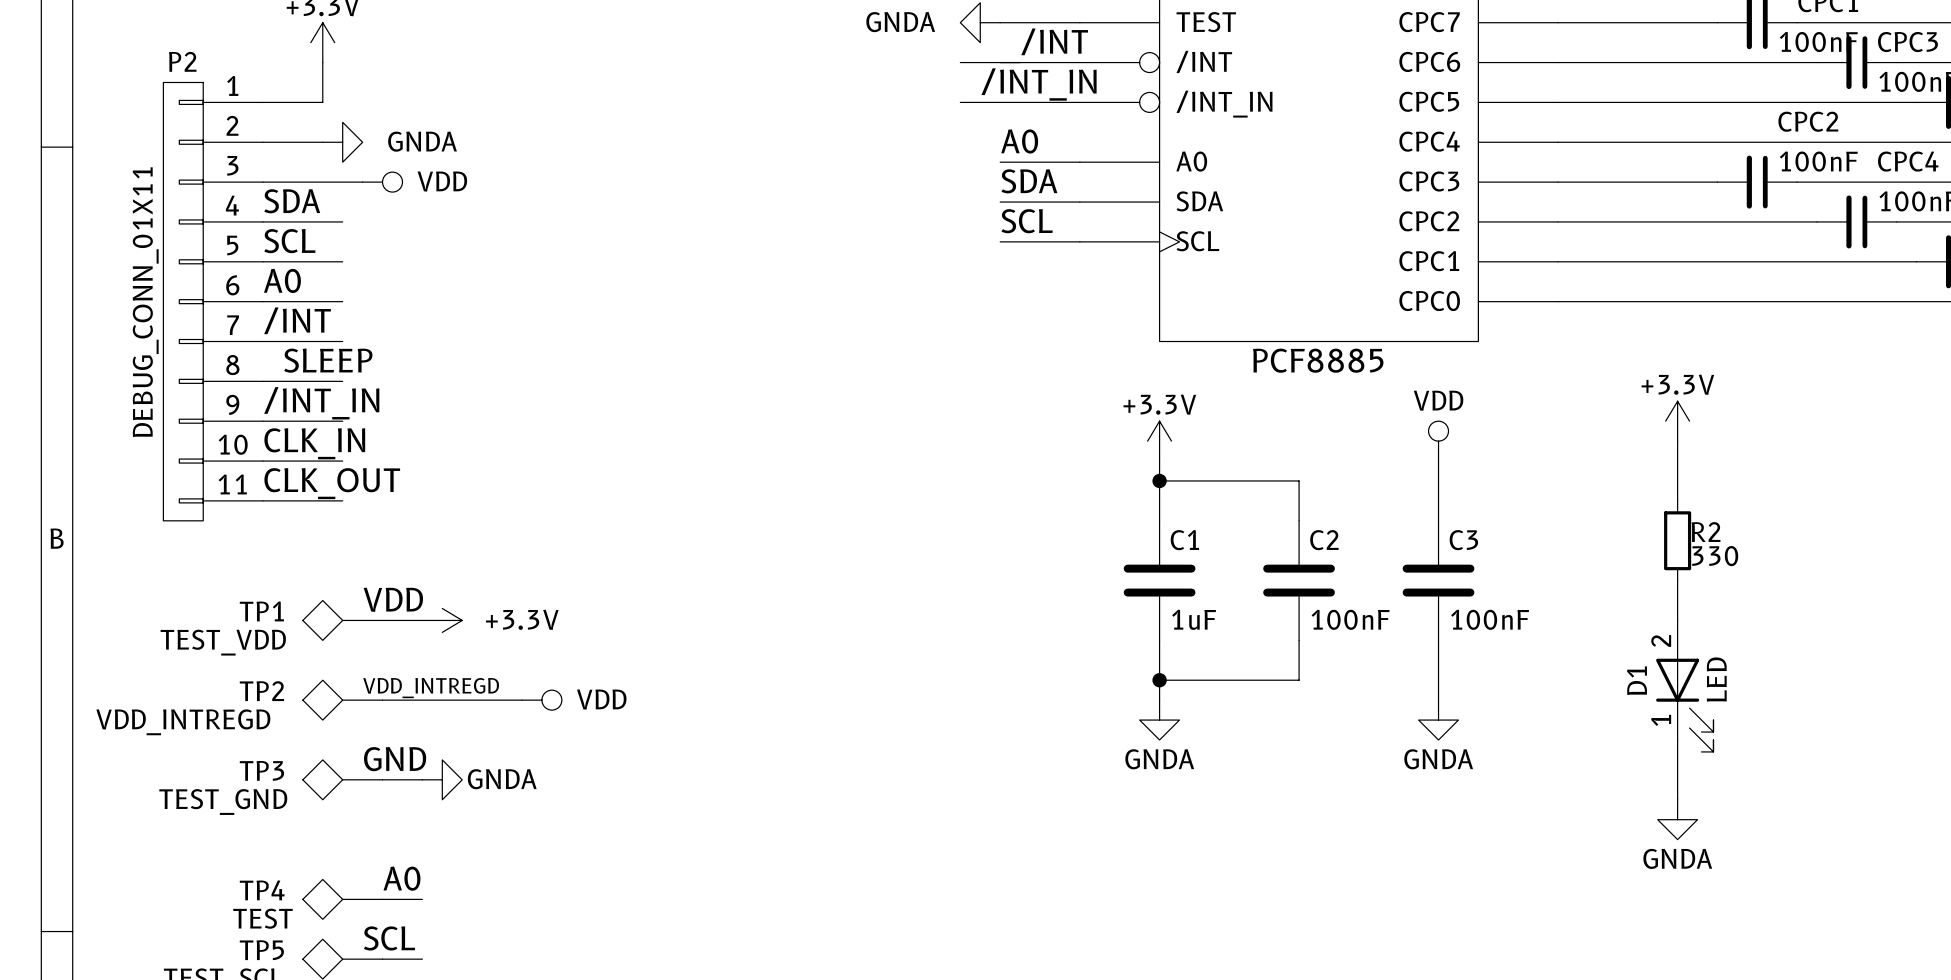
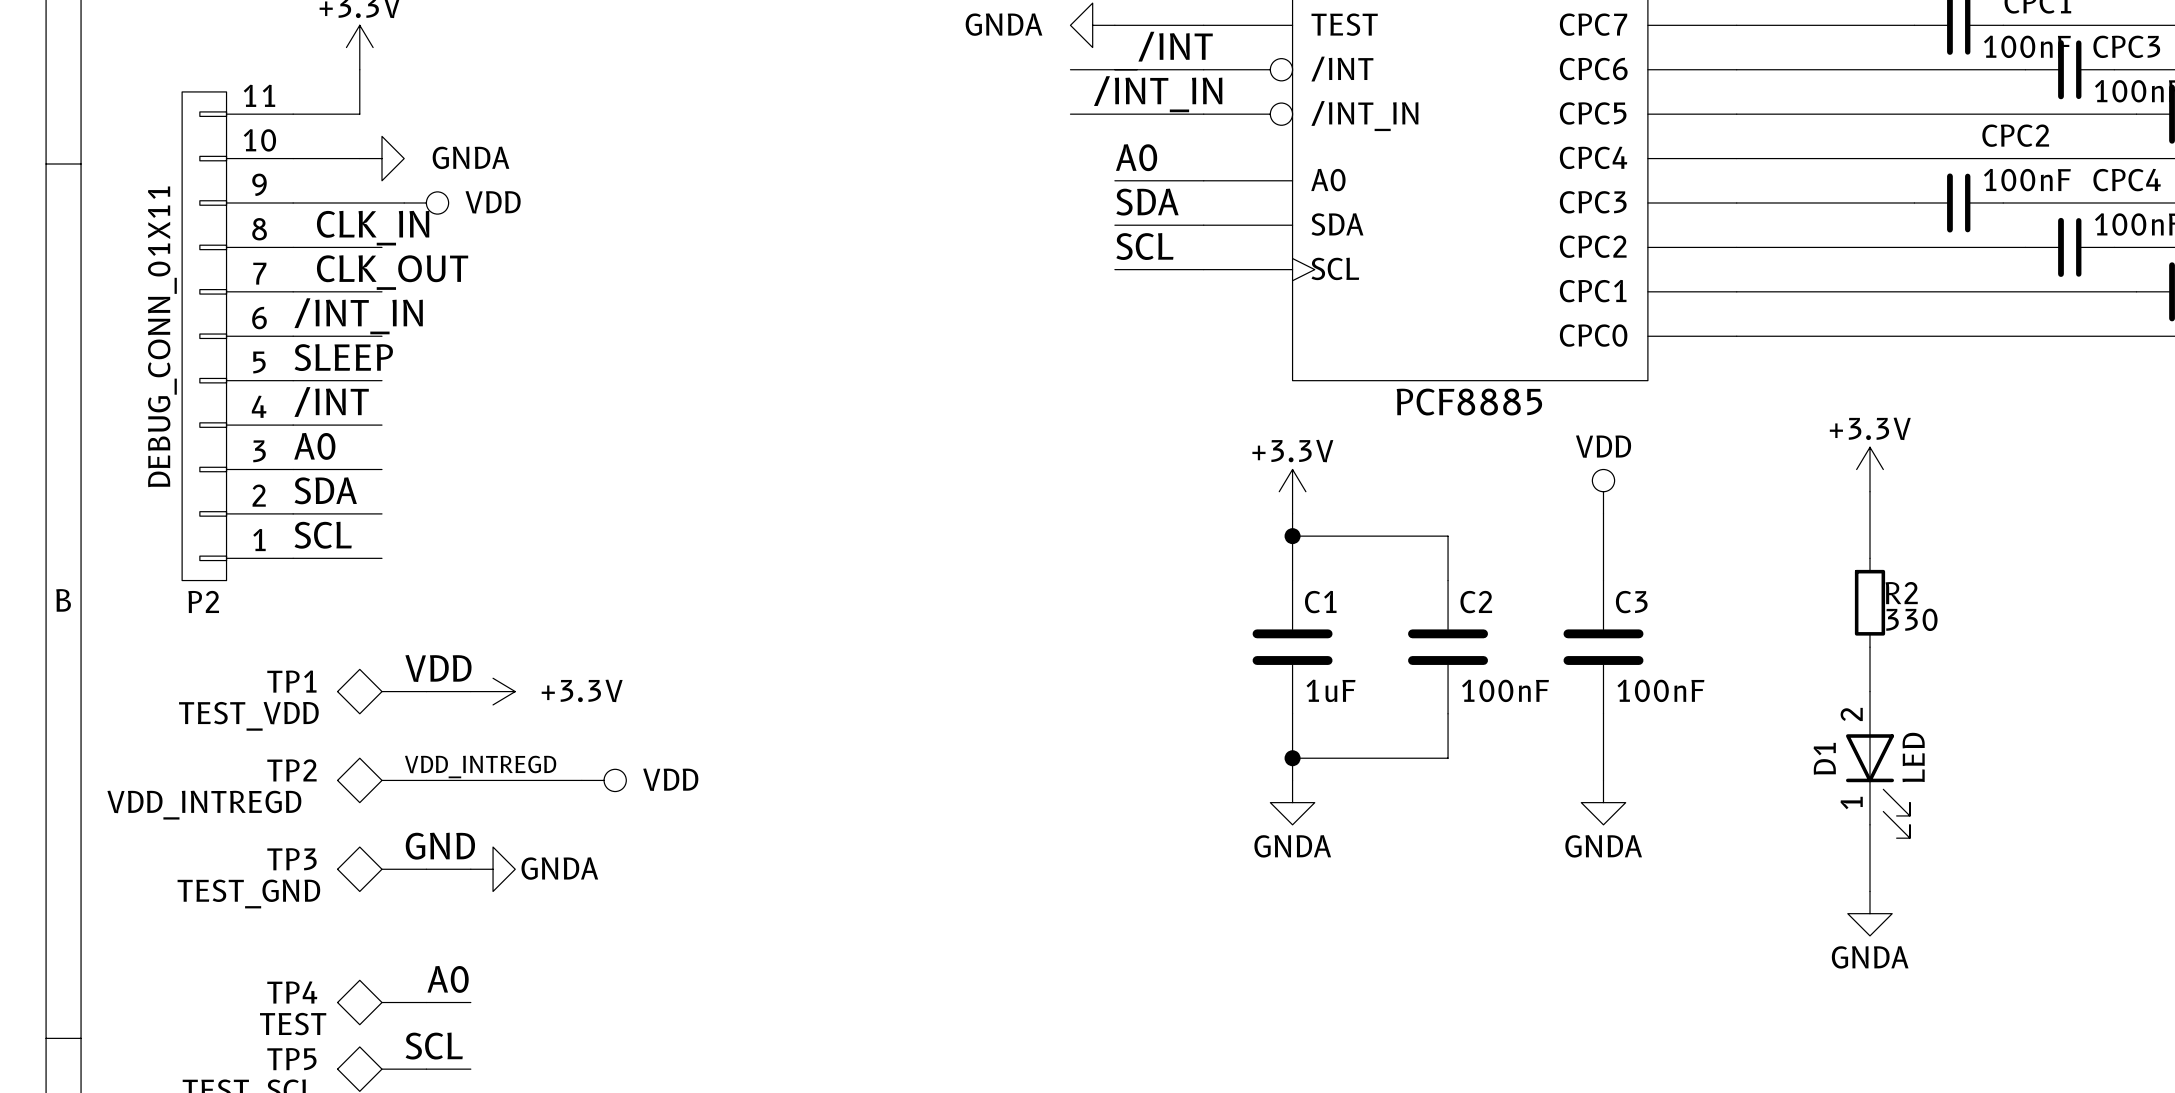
label: SDA (292, 201) -> none
label: none -> CLK_IN (373, 228)
label: SCL (289, 241) -> none
label: none -> CLK_OUT (392, 272)
label: A0 (282, 280) -> /INT_IN (358, 316)
P2 flip: as is (183, 301) -> up-down (204, 336)
label: /INT (297, 320) -> SLEEP (343, 357)
label: none -> /INT (331, 402)
label: SLEEP (328, 360) -> none
label: /INT_IN (321, 403) -> A0 (314, 446)
label: CLK_IN (314, 443) -> SDA (325, 490)
label: CLK_OUT (332, 483) -> SCL (323, 535)

